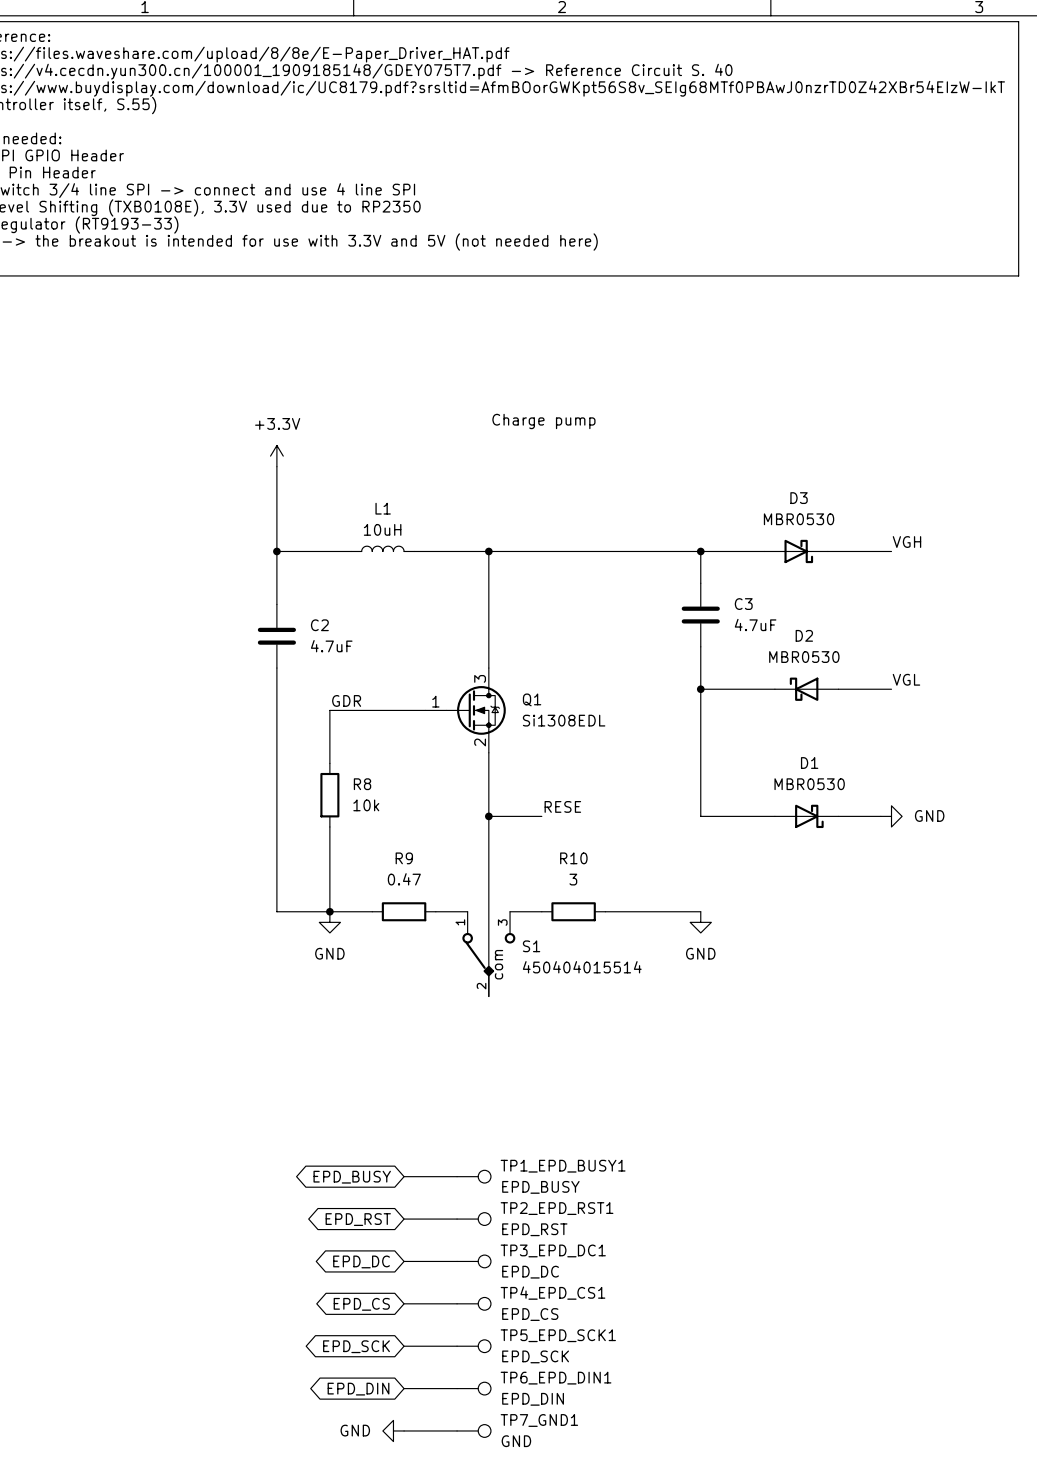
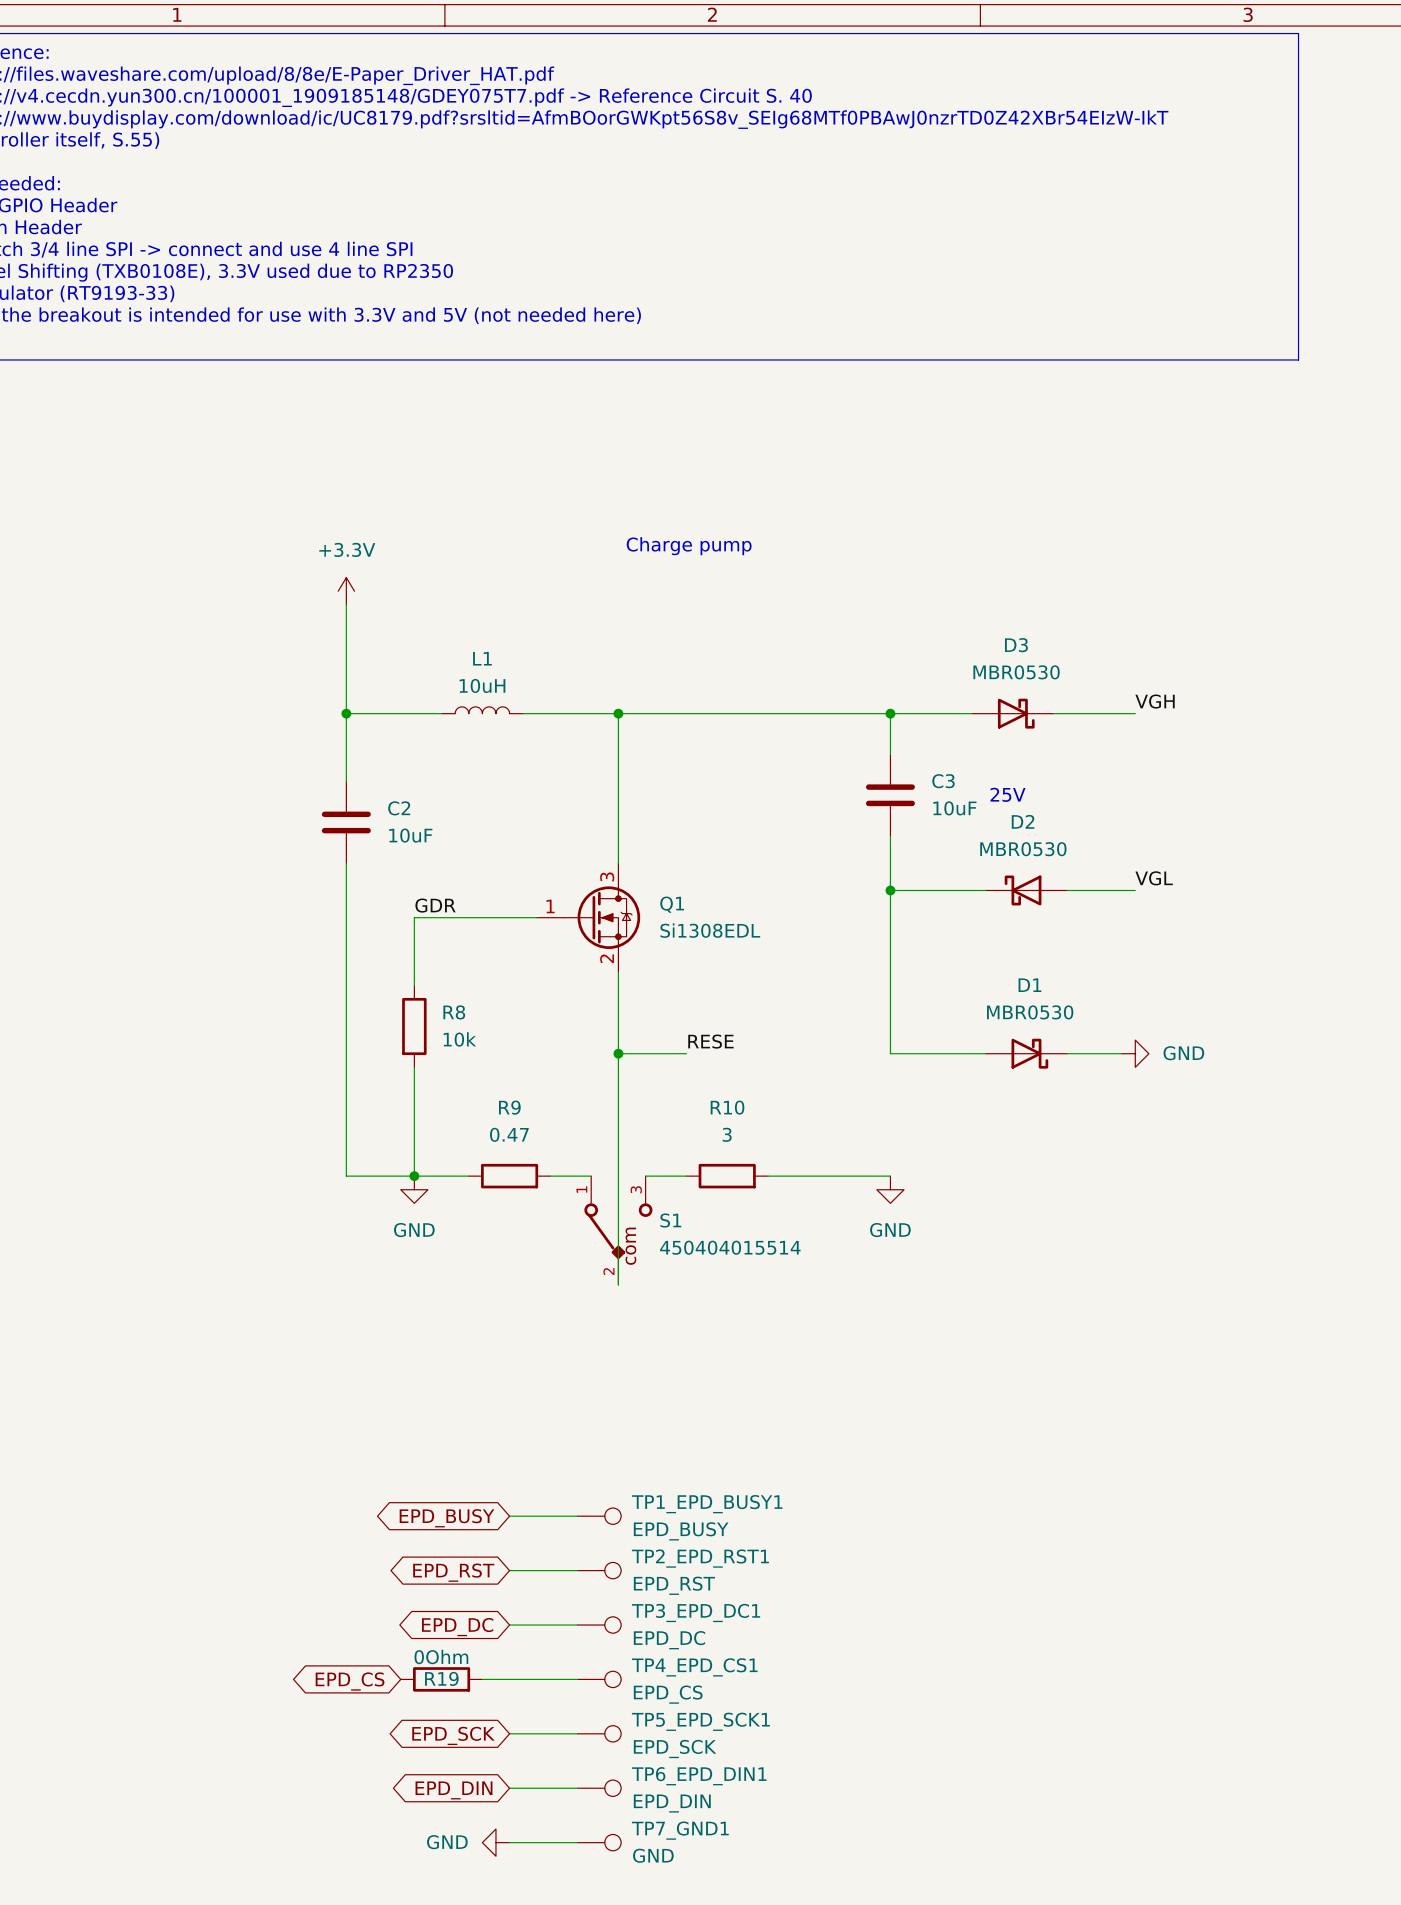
text: none -> 25V (1008, 794)
C3 value: 4.7uF (755, 625) -> 10uF (954, 808)
C2 value: 4.7uF (331, 646) -> 10uF (410, 835)
R19: none -> 0Ohm (441, 1679)
wire: none -> (482, 1679) (509, 1679)
global label position: EPD_CS (361, 1304) -> EPD_CS (350, 1681)

